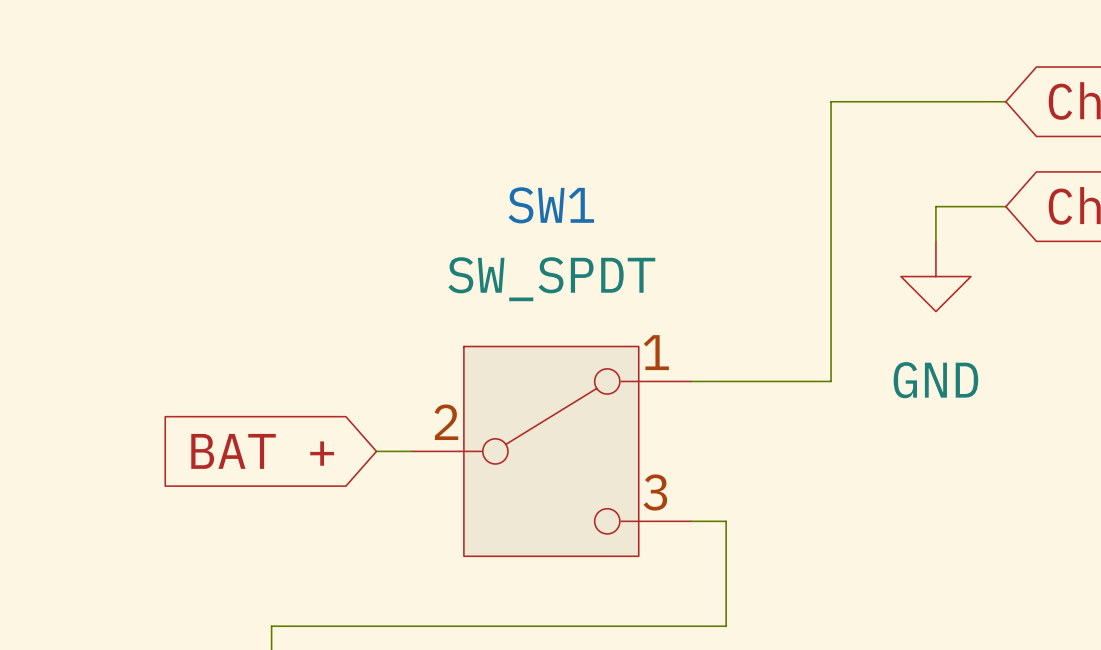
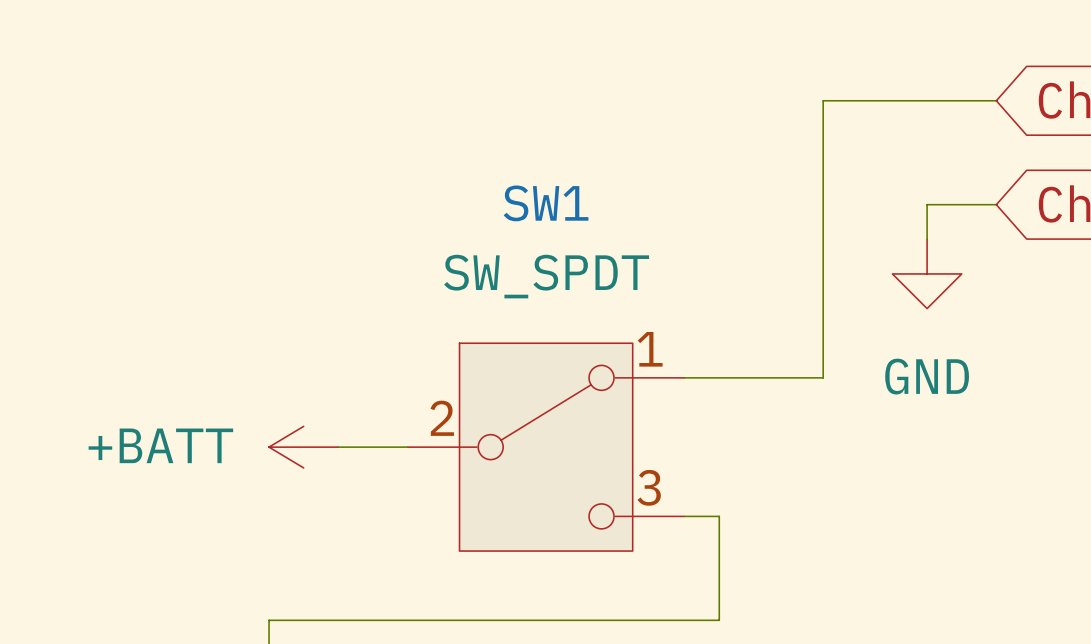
global label: BAT + (262, 451) -> none
power symbol: none -> +BATT (303, 447)
wire: none -> (338, 447) (372, 447)

